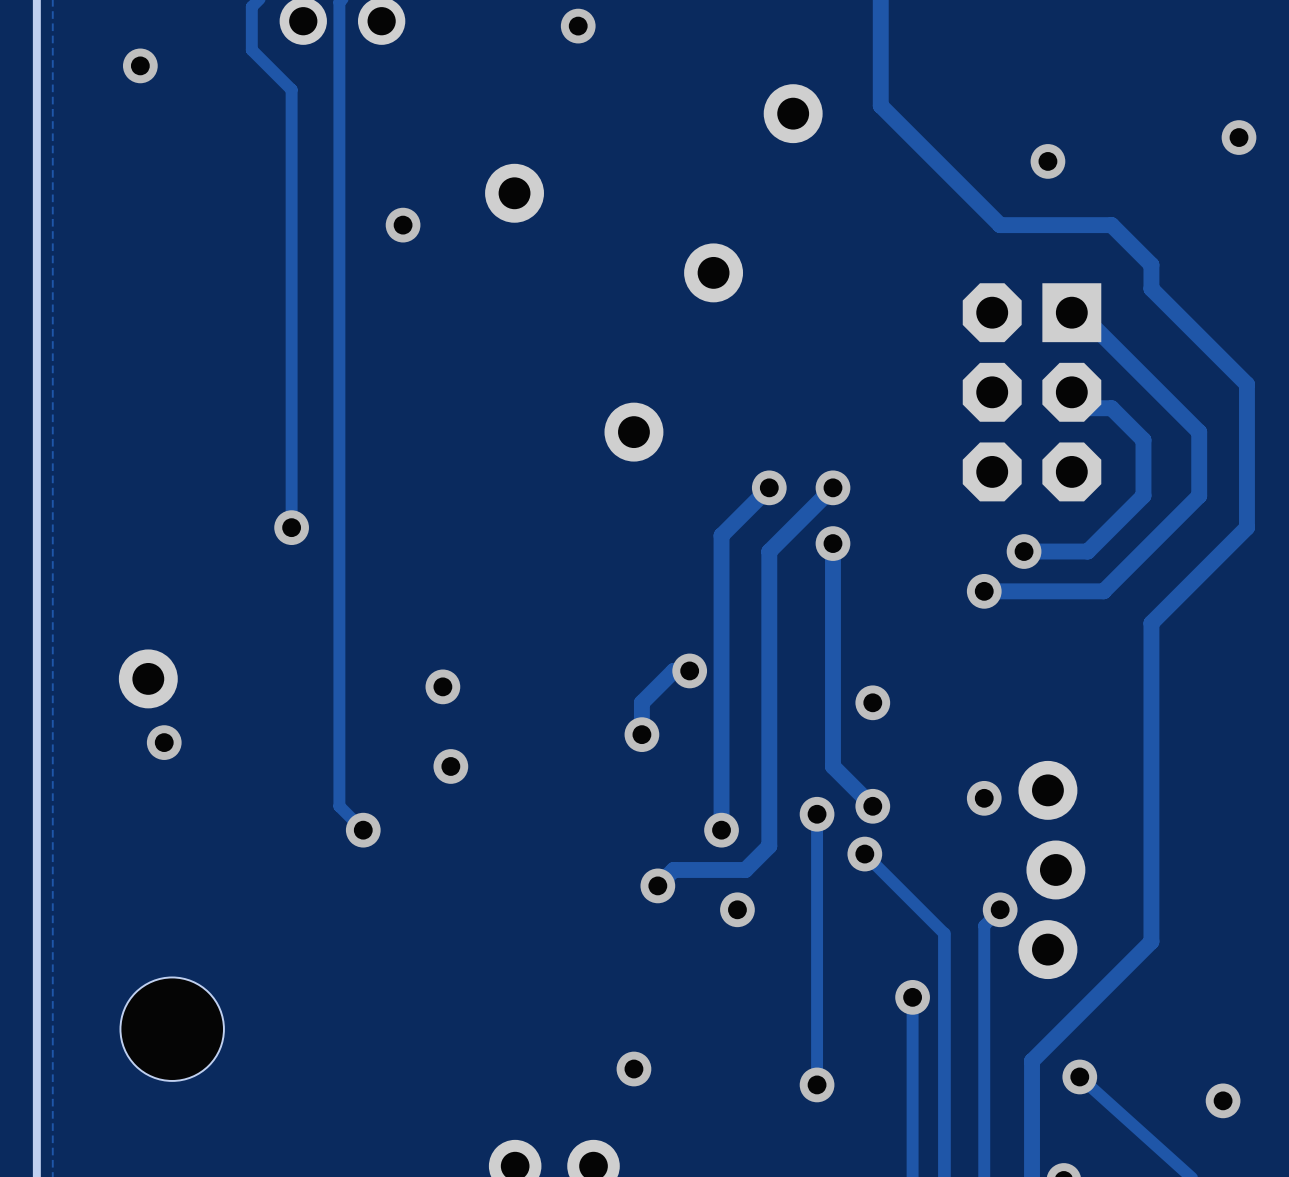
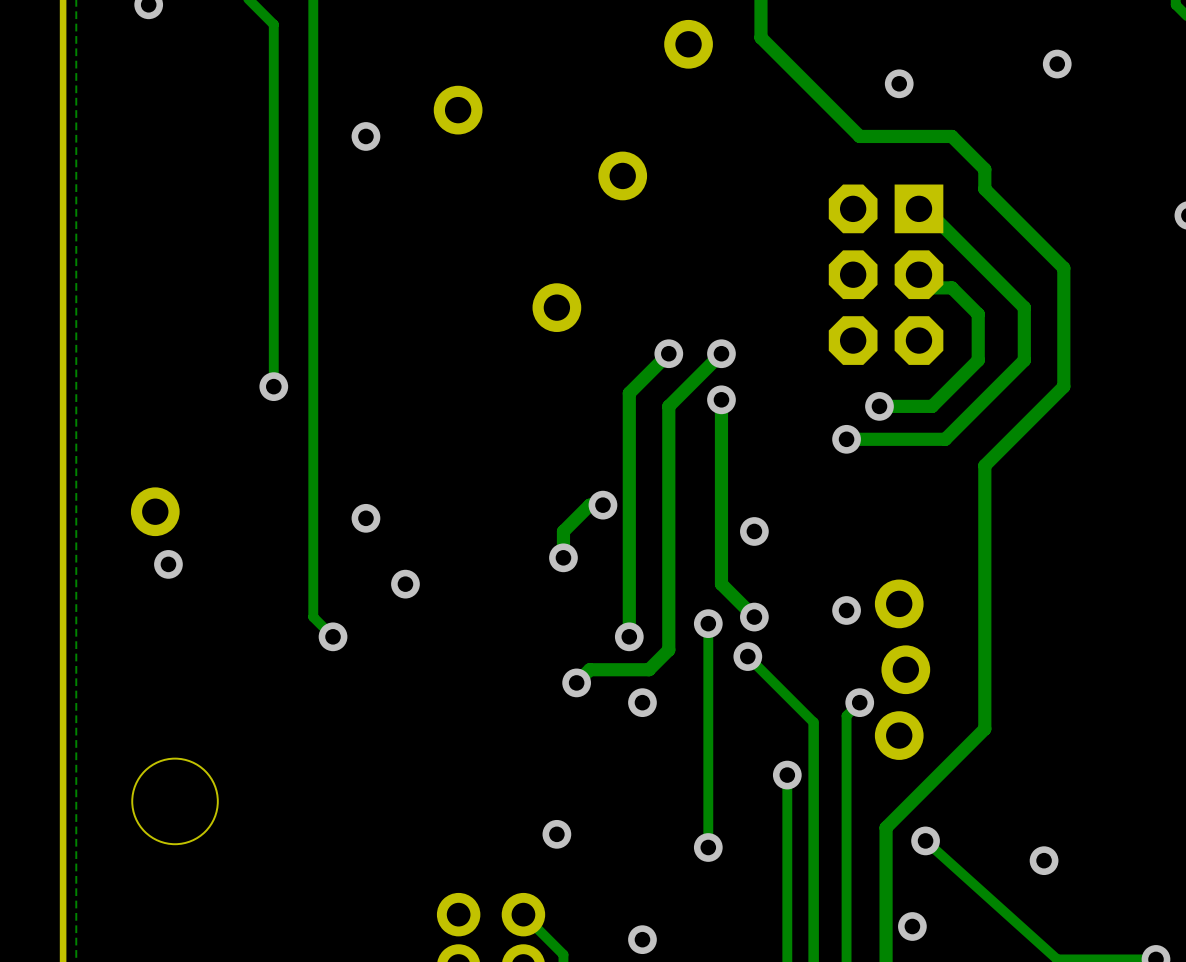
via position: (442, 686) -> (365, 518)

